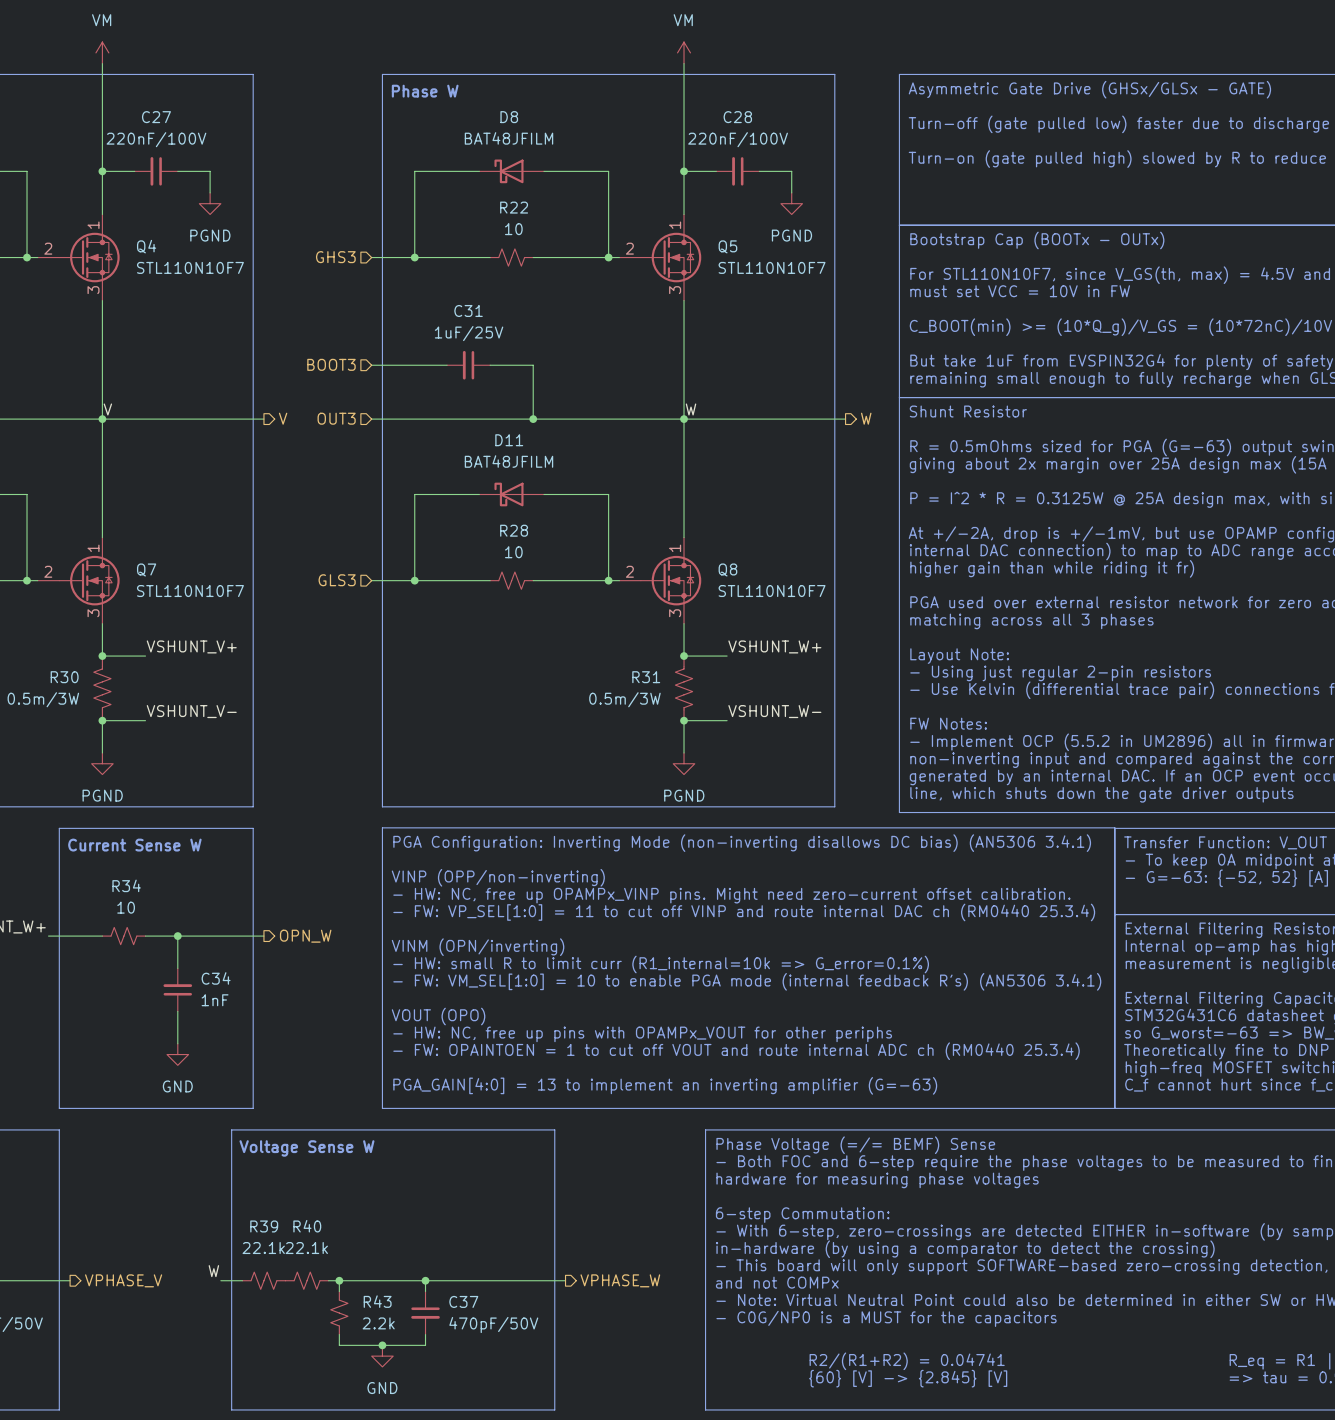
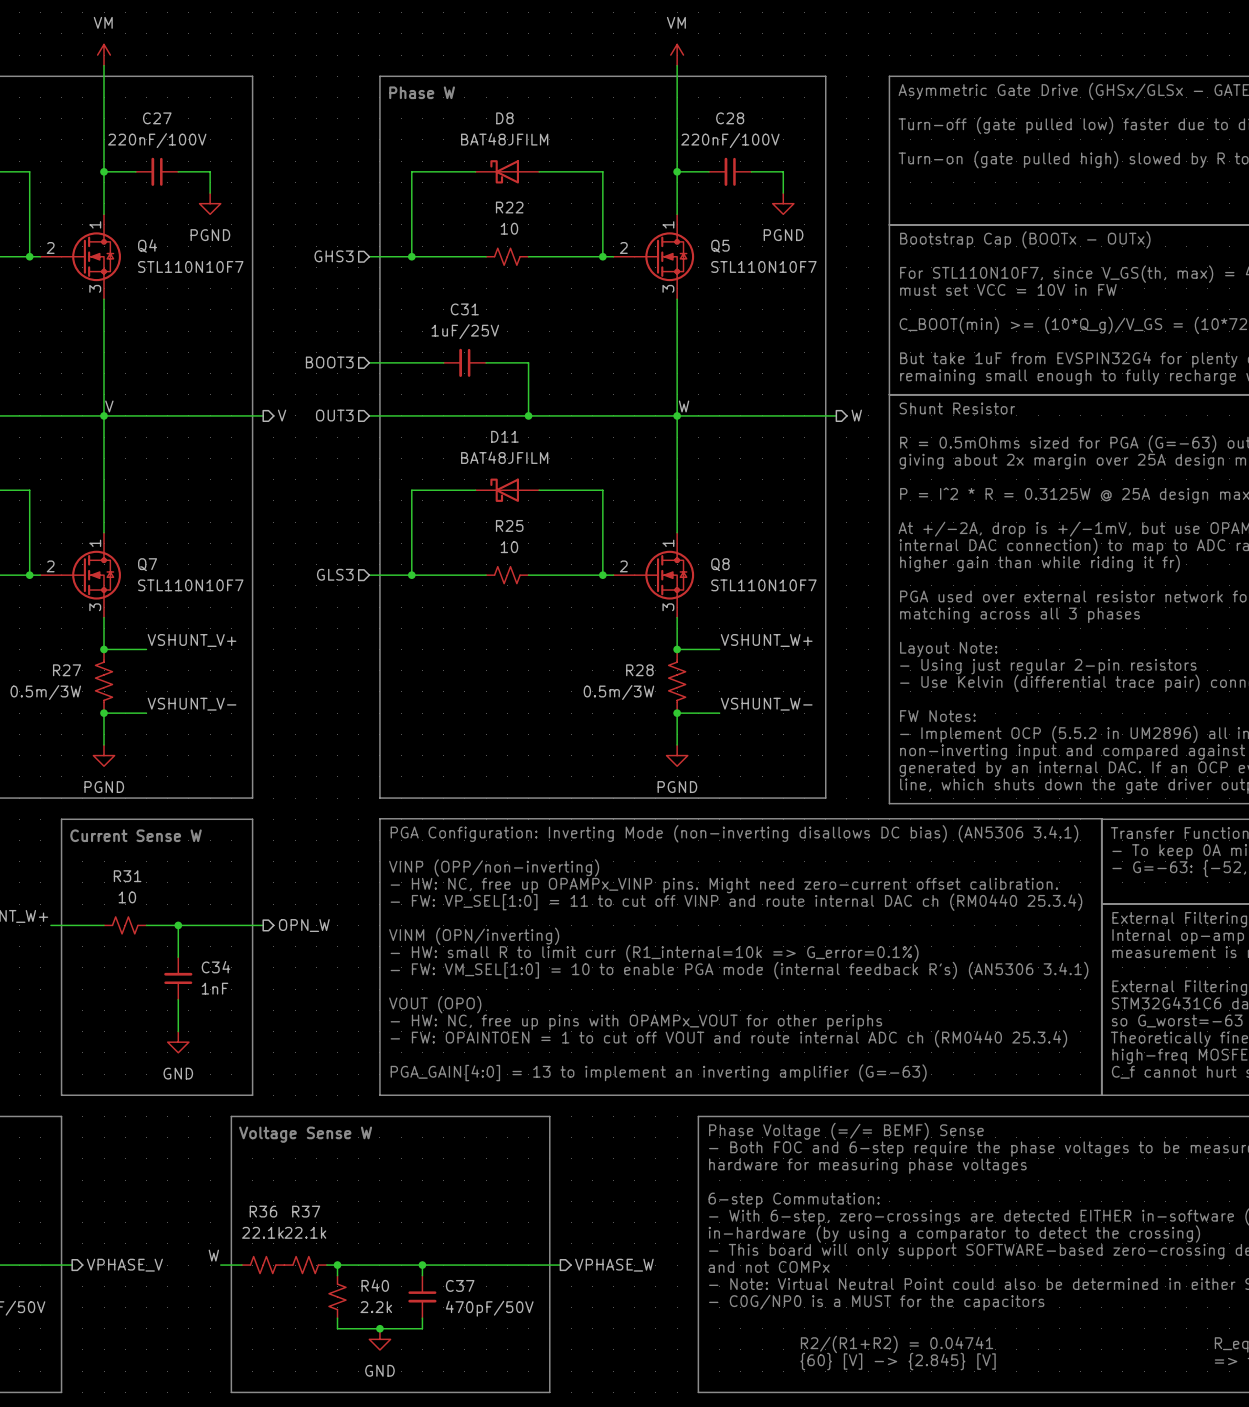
R28 name: R28 (514, 530) -> R25 (509, 525)
R30 name: R30 (64, 677) -> R27 (67, 670)
R31 name: R31 (646, 677) -> R28 (639, 670)
R34 name: R34 (126, 885) -> R31 (127, 876)
R39 name: R39 (264, 1226) -> R36 (263, 1211)
R40 name: R40 (307, 1226) -> R37 (306, 1211)
R43 name: R43 (377, 1301) -> R40 (375, 1285)

